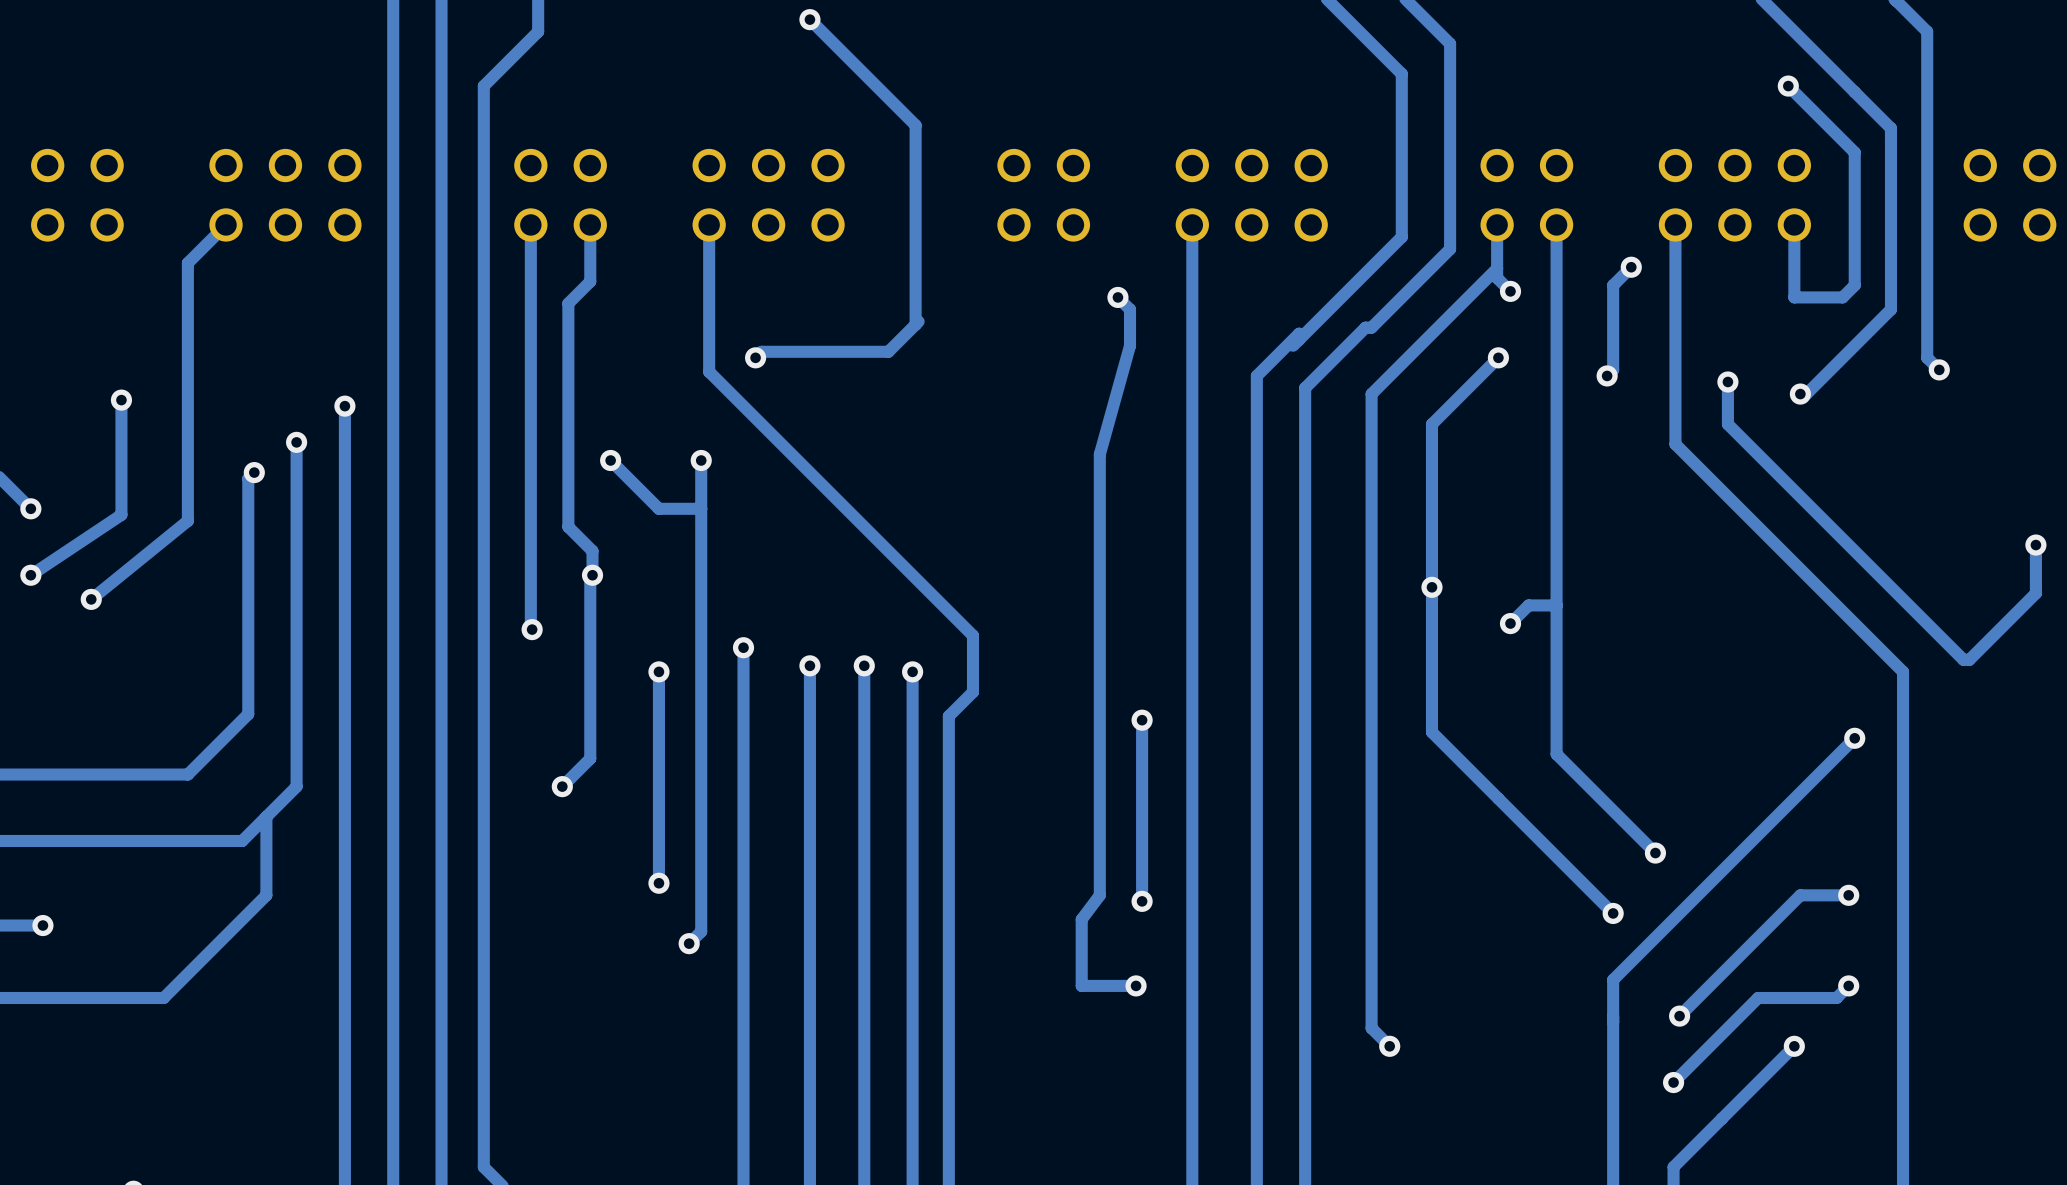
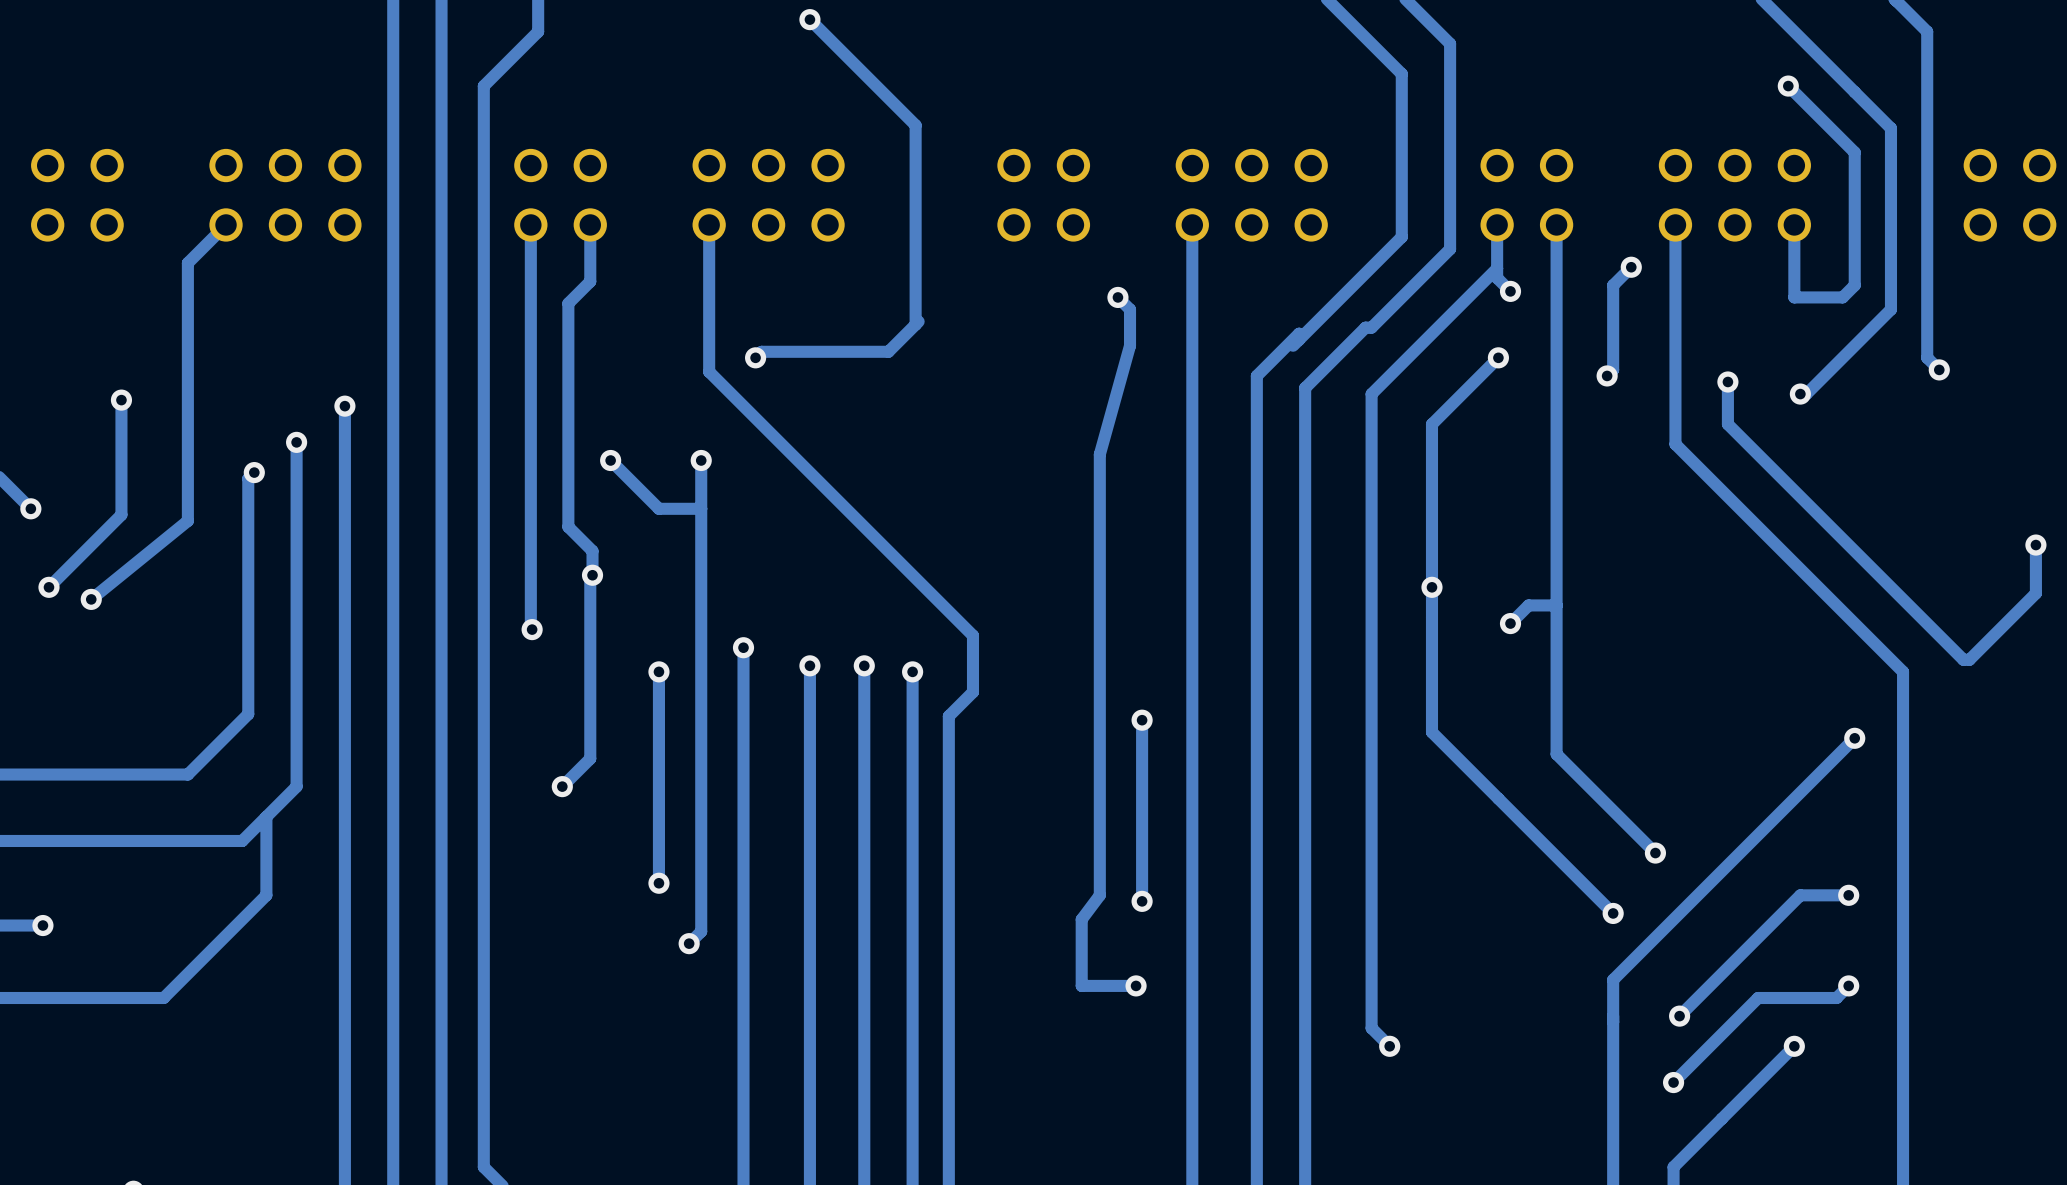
track: (121, 514) (30, 575) -> (121, 514) (48, 587)
via position: (30, 575) -> (48, 587)

